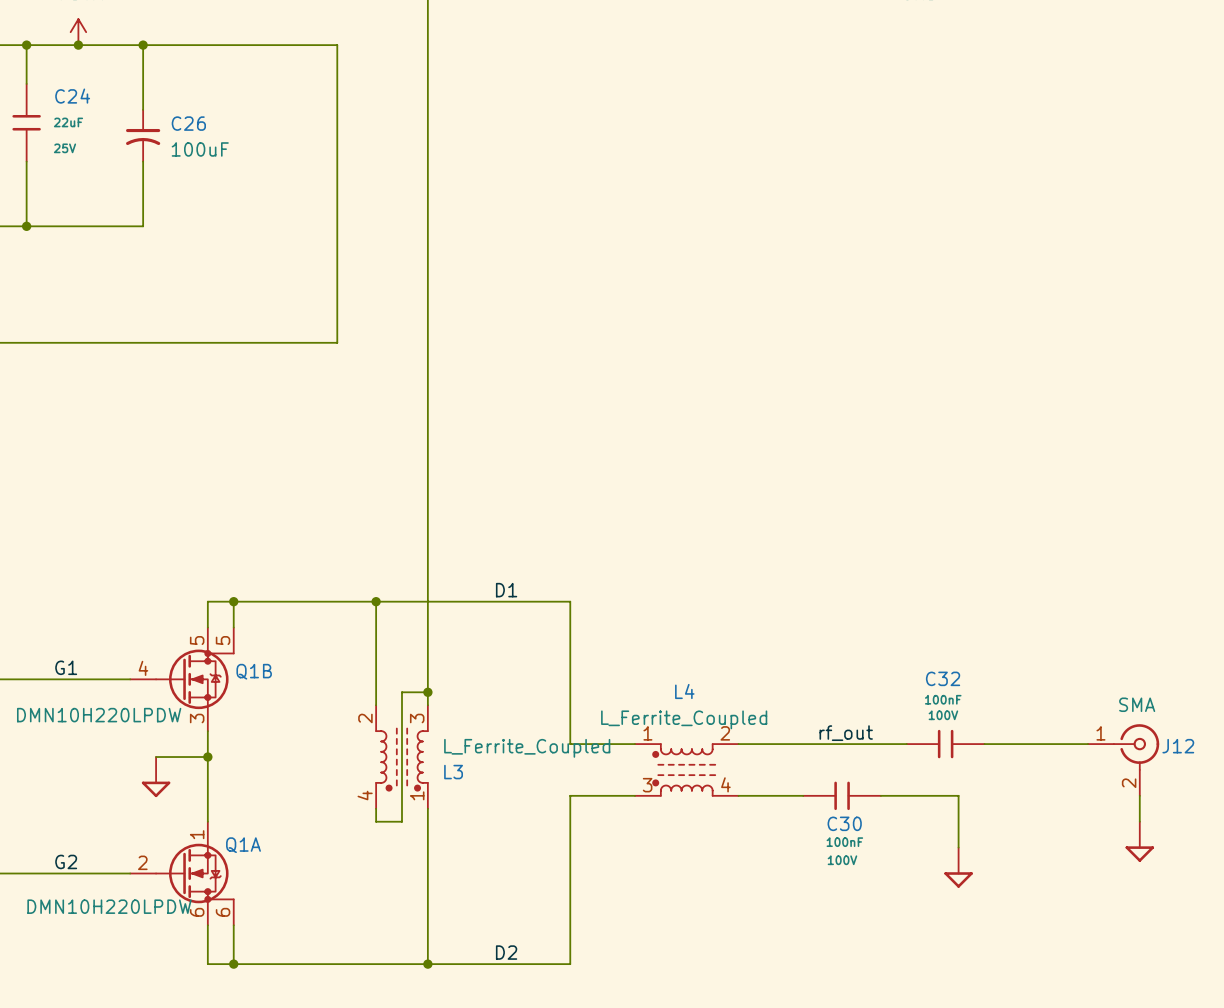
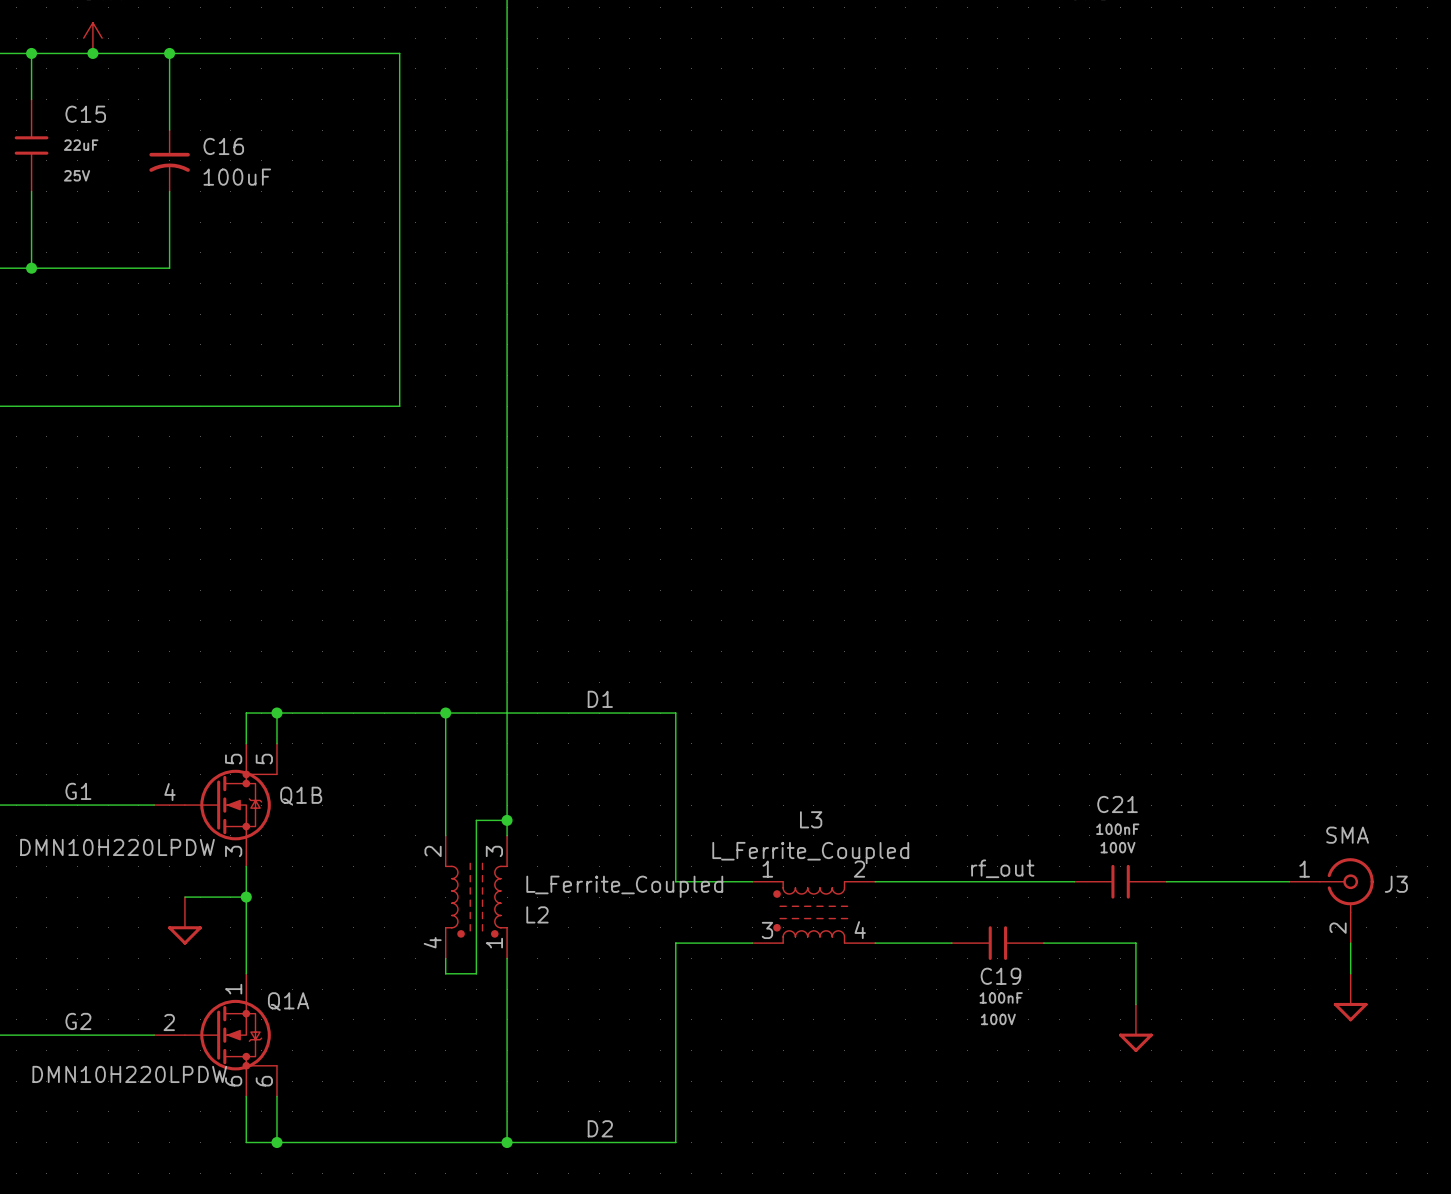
C24 name: C24 (72, 96) -> C15 (85, 114)
C26 name: C26 (188, 123) -> C16 (223, 146)
C32 name: C32 (943, 678) -> C21 (1117, 804)
L4 name: L4 (684, 691) -> L3 (811, 819)
J12 name: J12 (1178, 746) -> J3 (1396, 884)
L3 name: L3 (453, 772) -> L2 (537, 914)
C30 name: C30 (844, 823) -> C19 (1000, 976)

